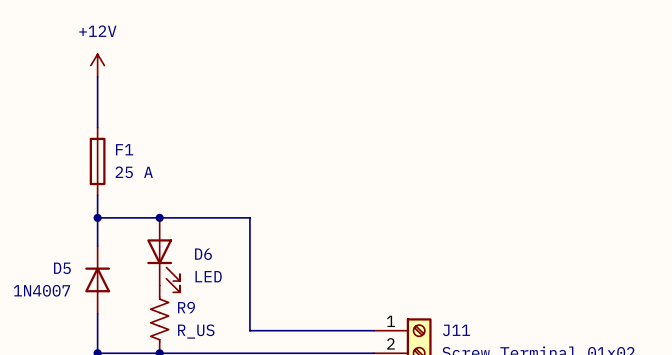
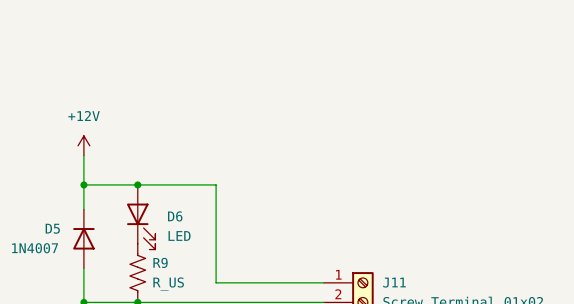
power symbol position: +12V (97, 65) -> +12V (83, 145)
wire: (97, 76) (97, 127) -> none
F1: 25 A (97, 161) -> none

